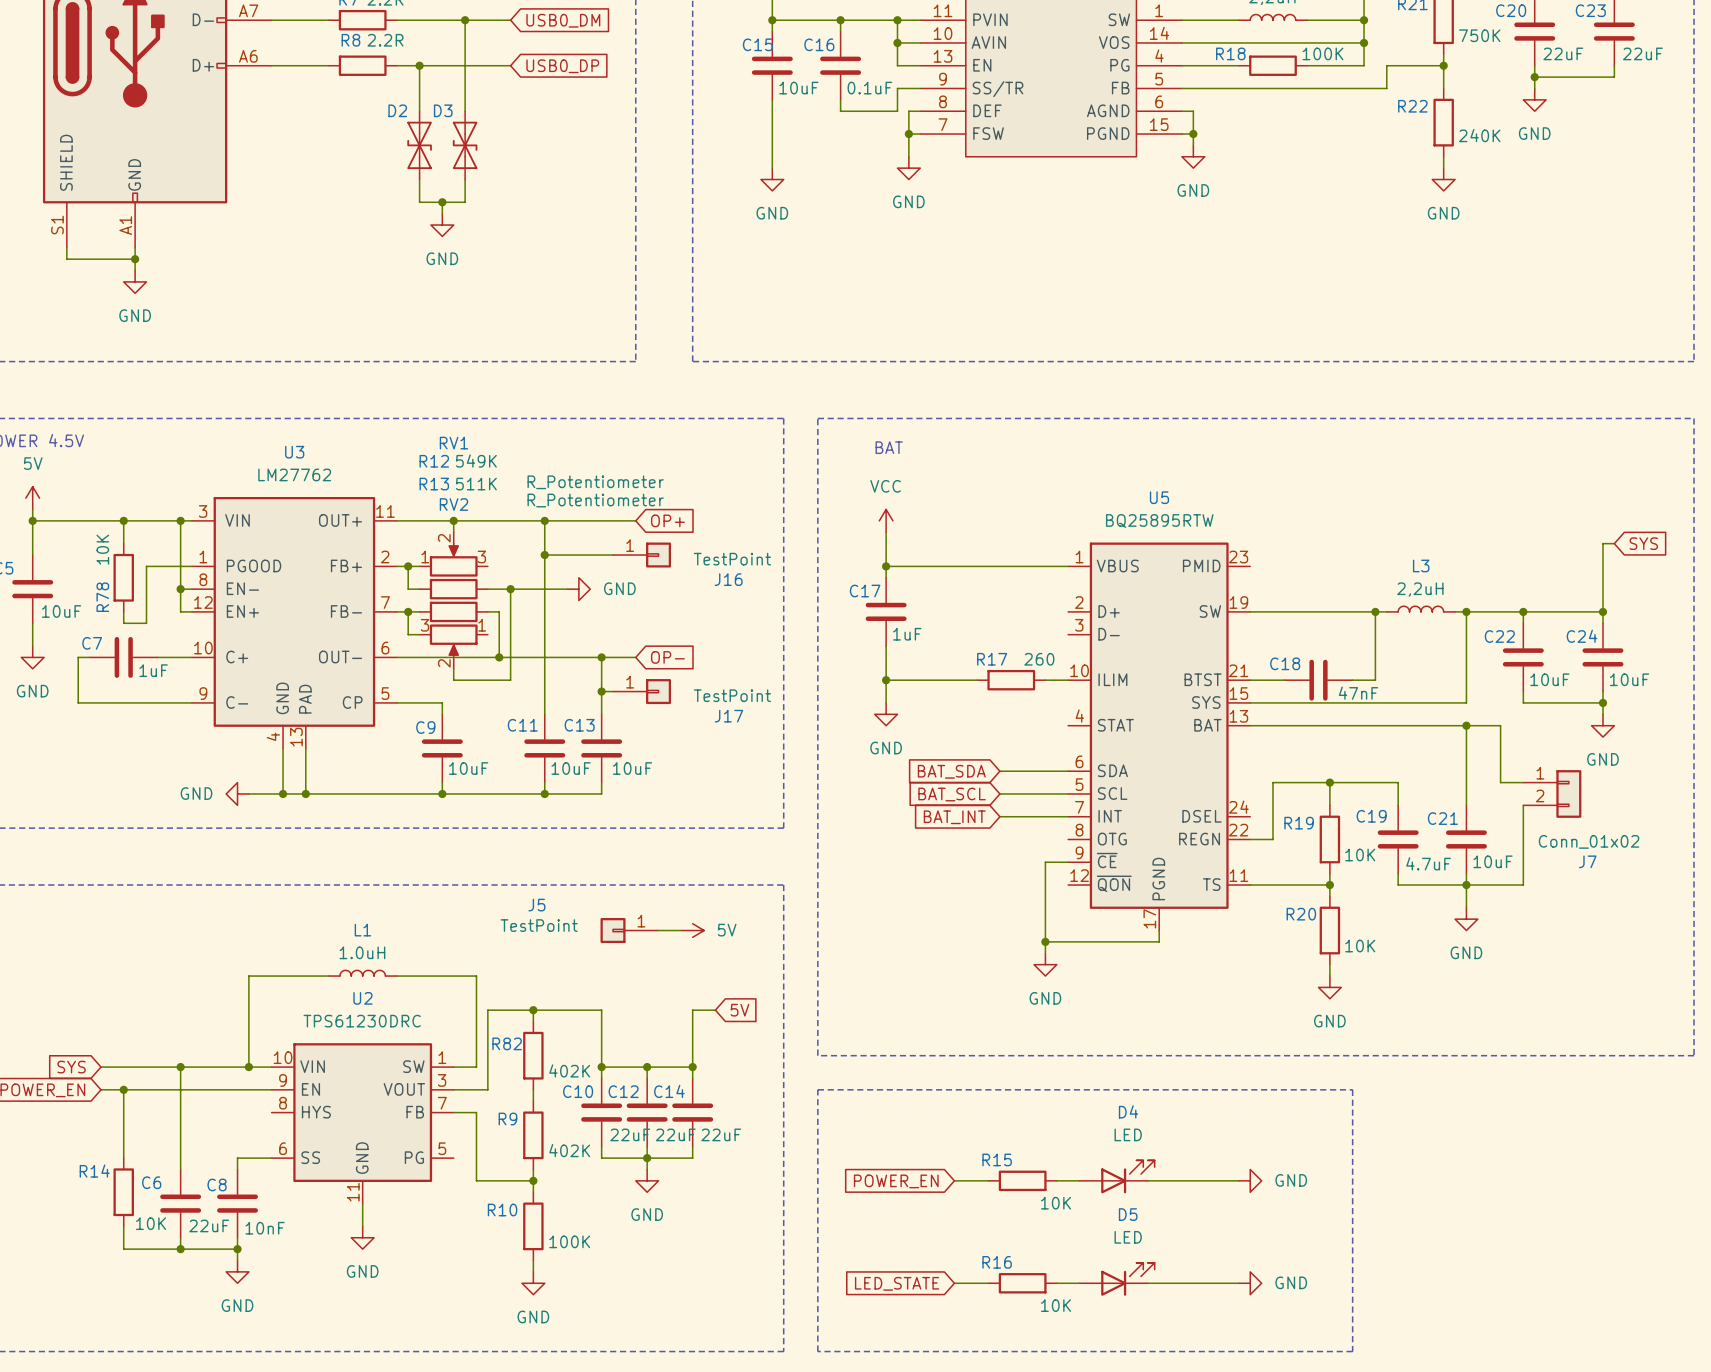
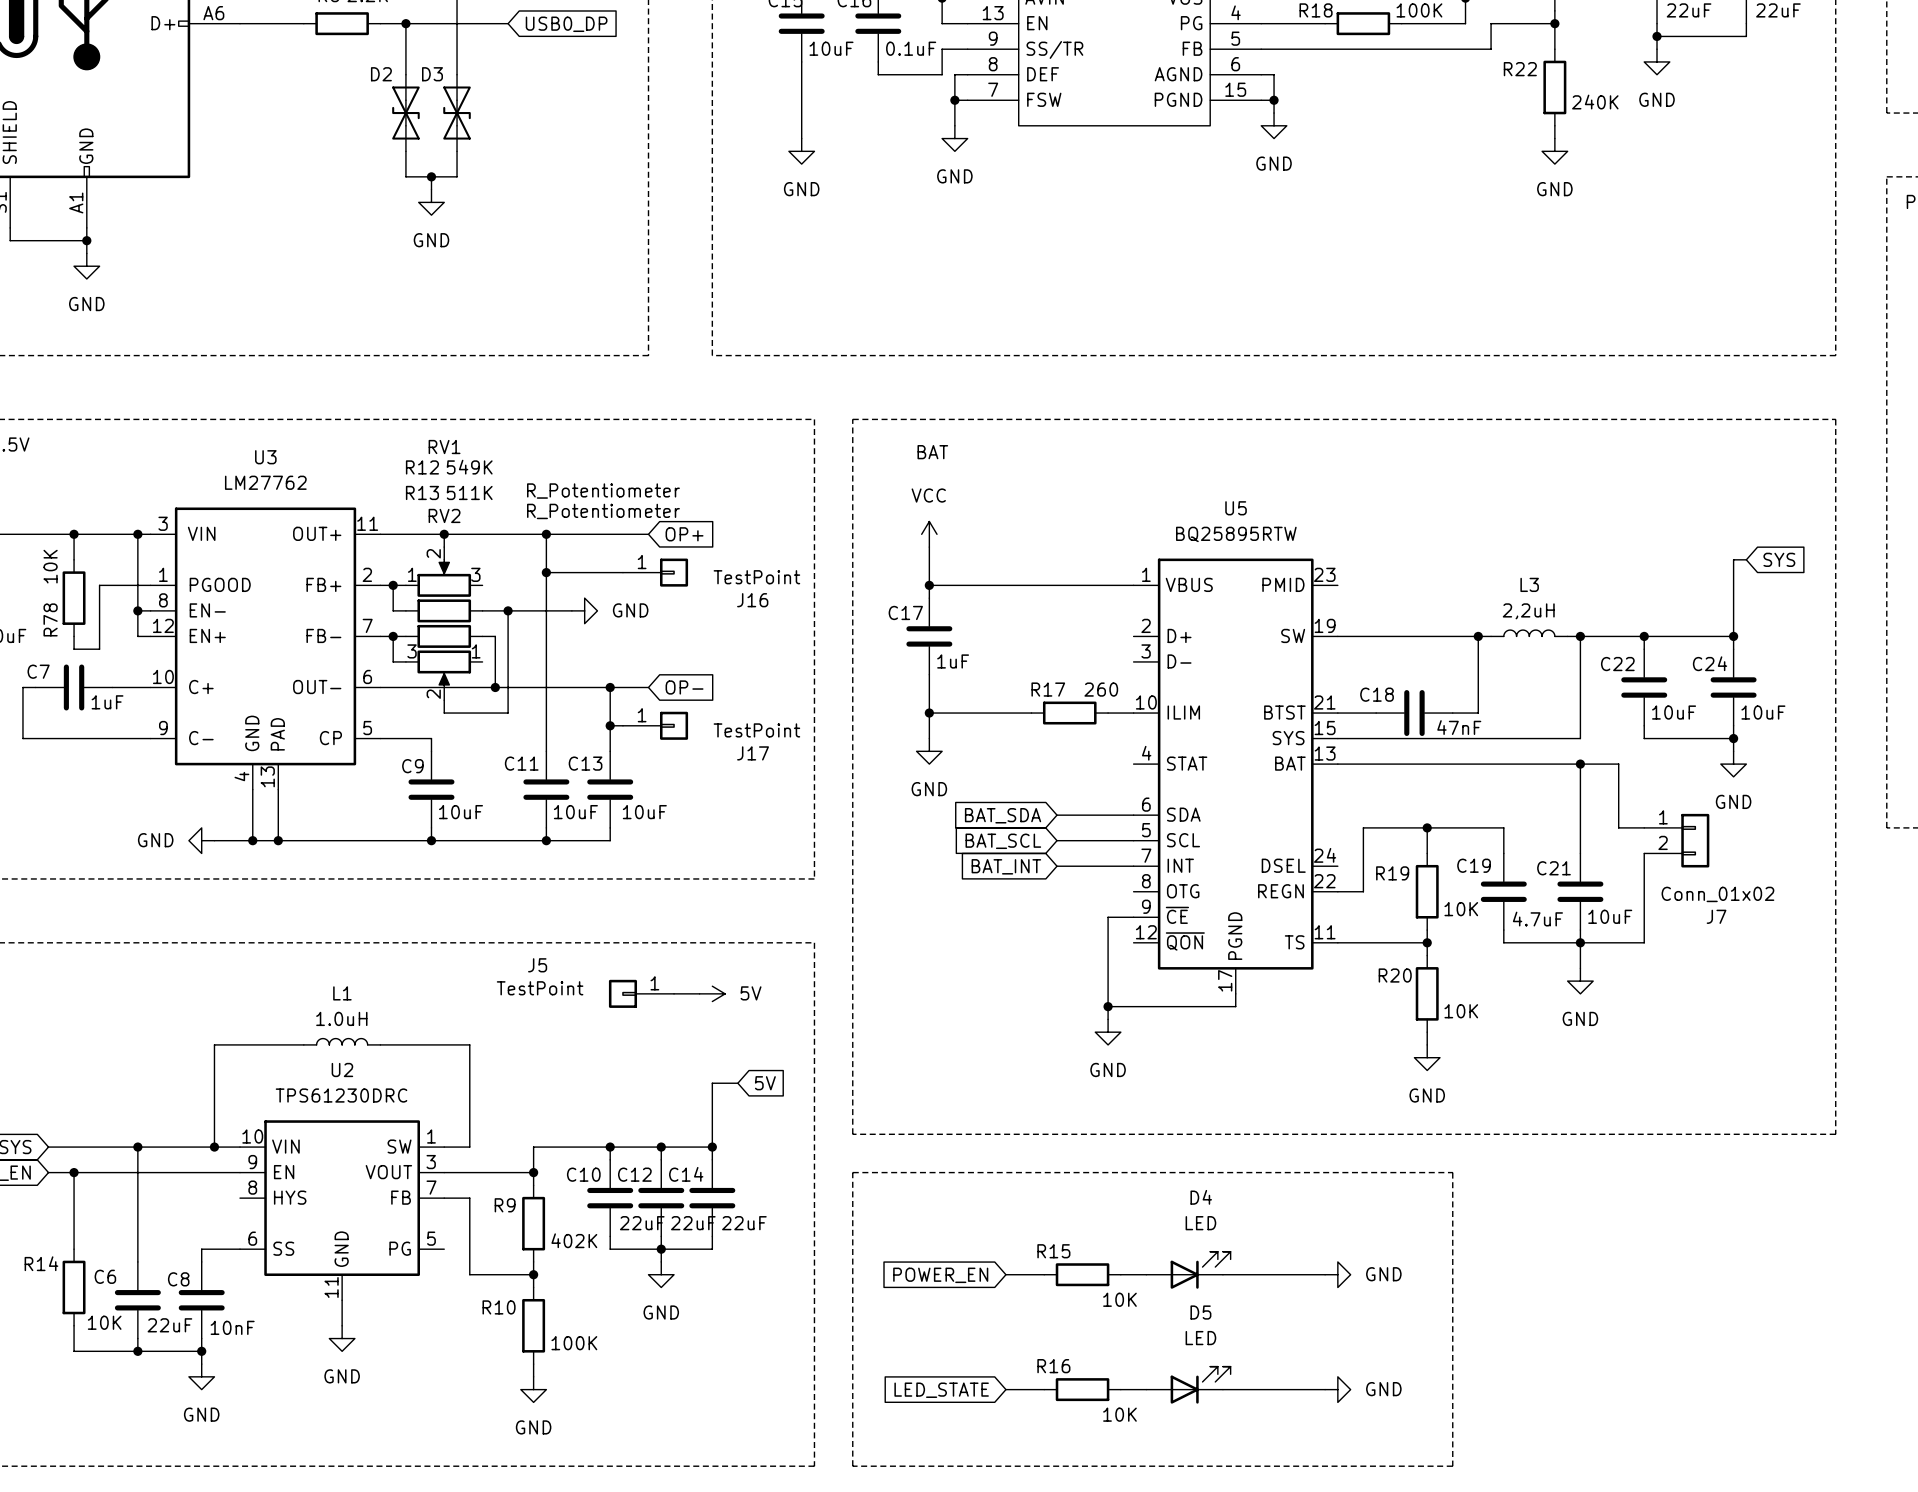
wire: (533, 1010) (533, 1021) -> none
junction: (533, 1010) -> none
R82: 402K (533, 1055) -> none
wire: (601, 1067) (601, 1010) (487, 1010) (487, 1089) -> (610, 1147) (533, 1147) (533, 1172) (482, 1172)
junction: none -> (533, 1172)

